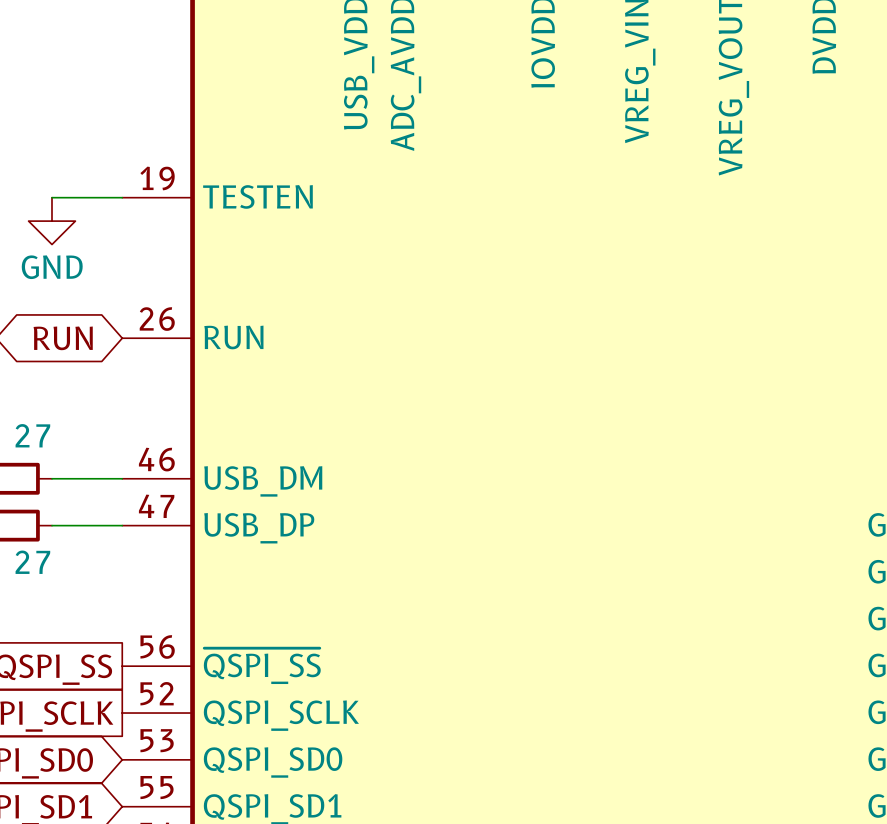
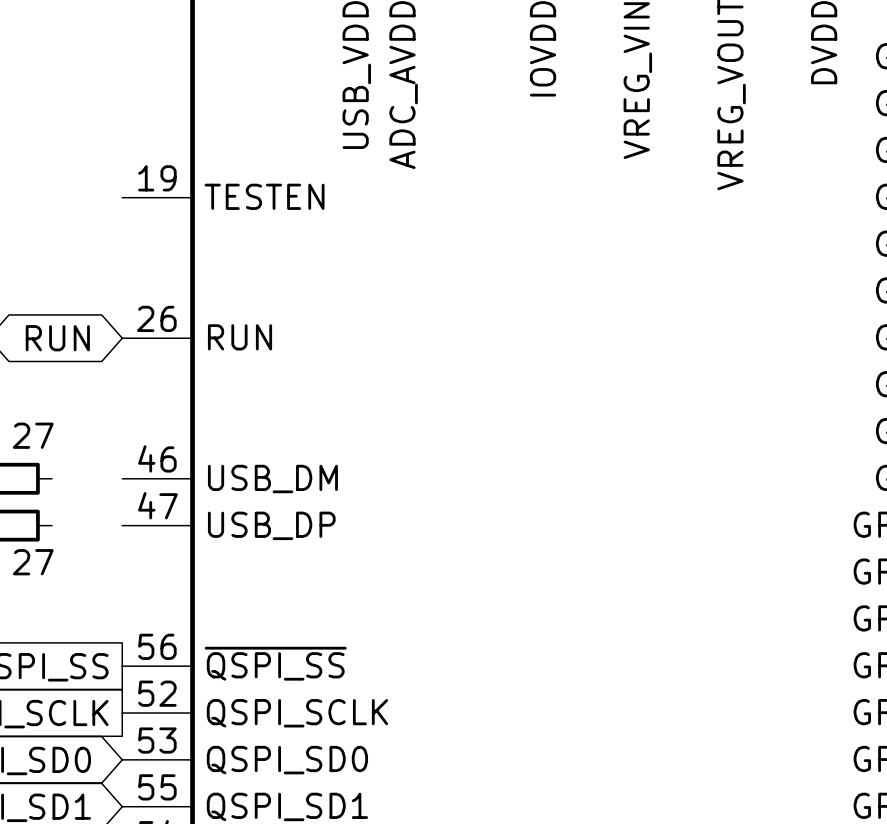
wire: (51, 197) (122, 197) -> none
power symbol: GND (51, 221) -> none
wire: (51, 478) (122, 478) -> none
wire: (51, 525) (122, 525) -> none

